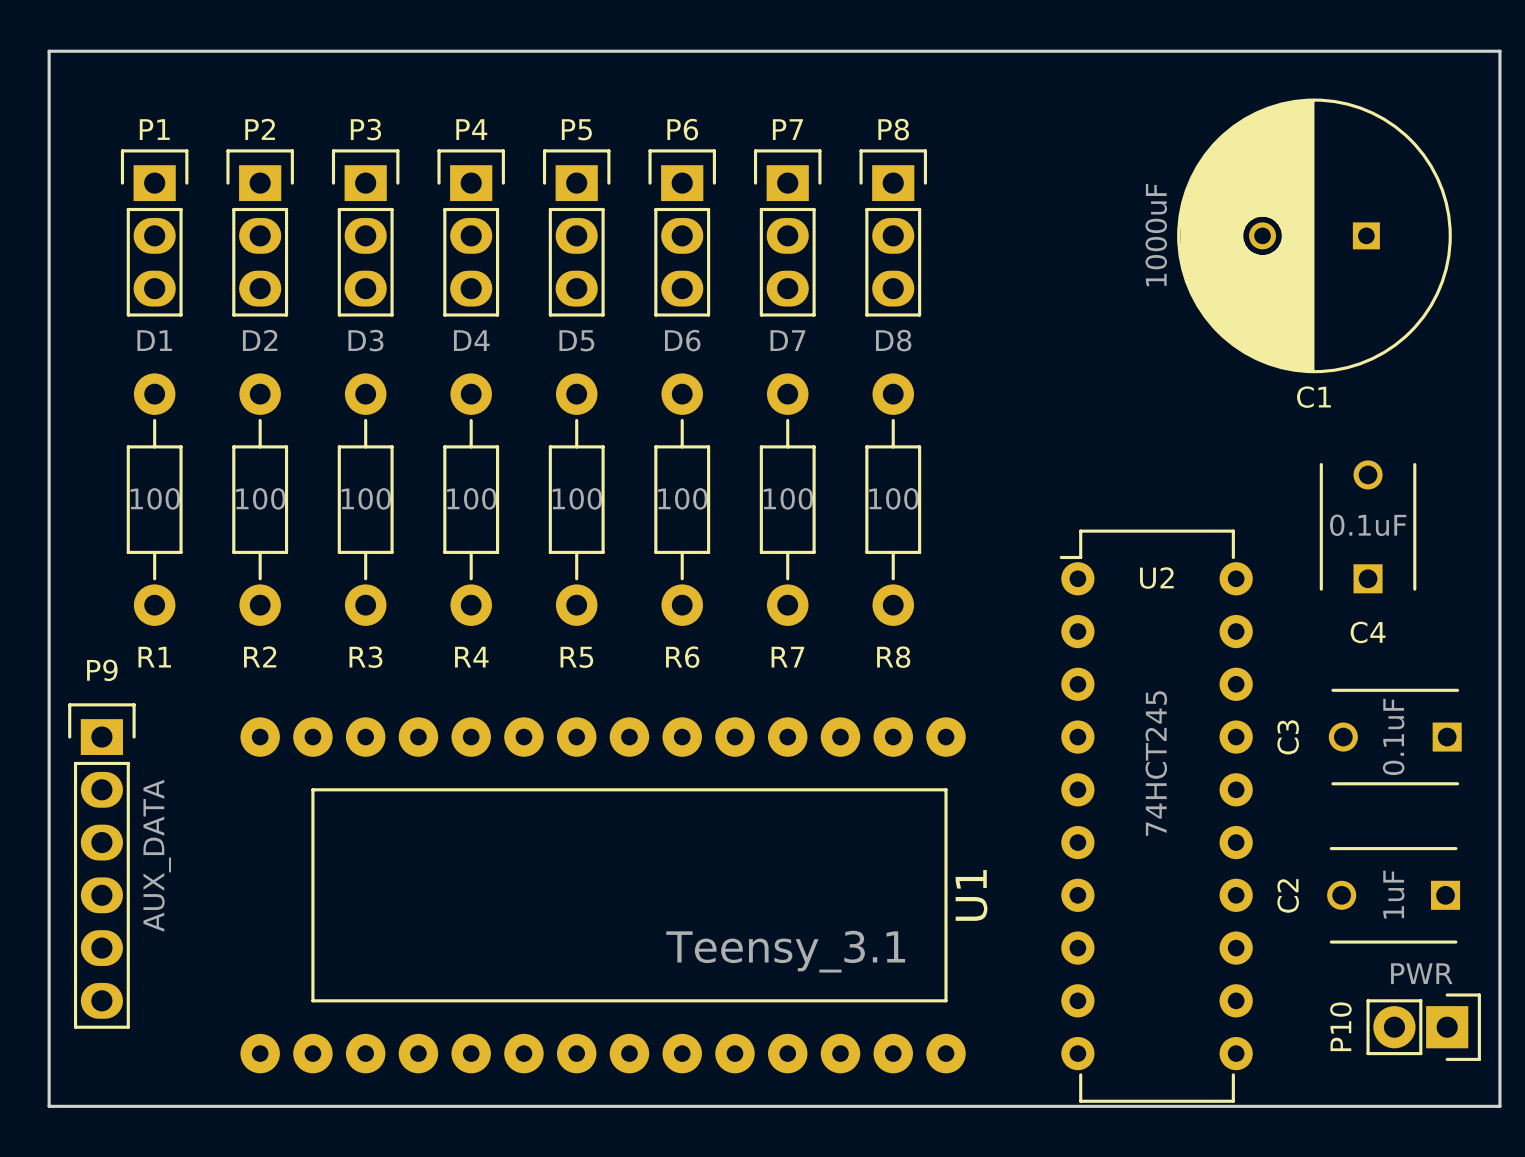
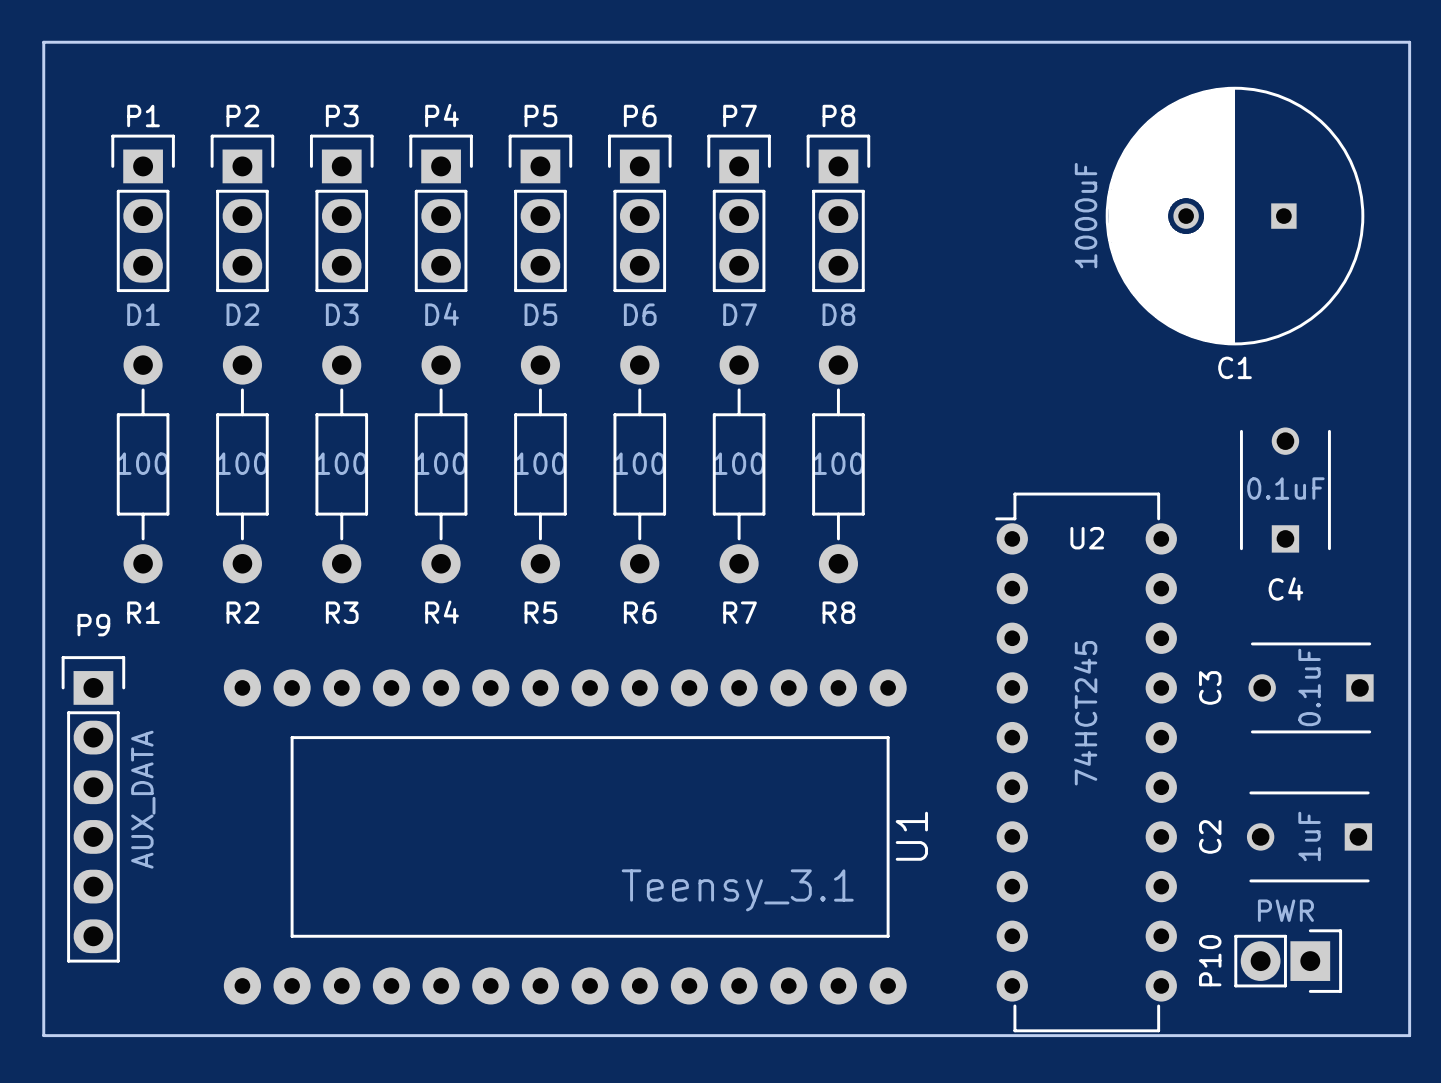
P10 position: (1423, 1027) -> (1288, 961)

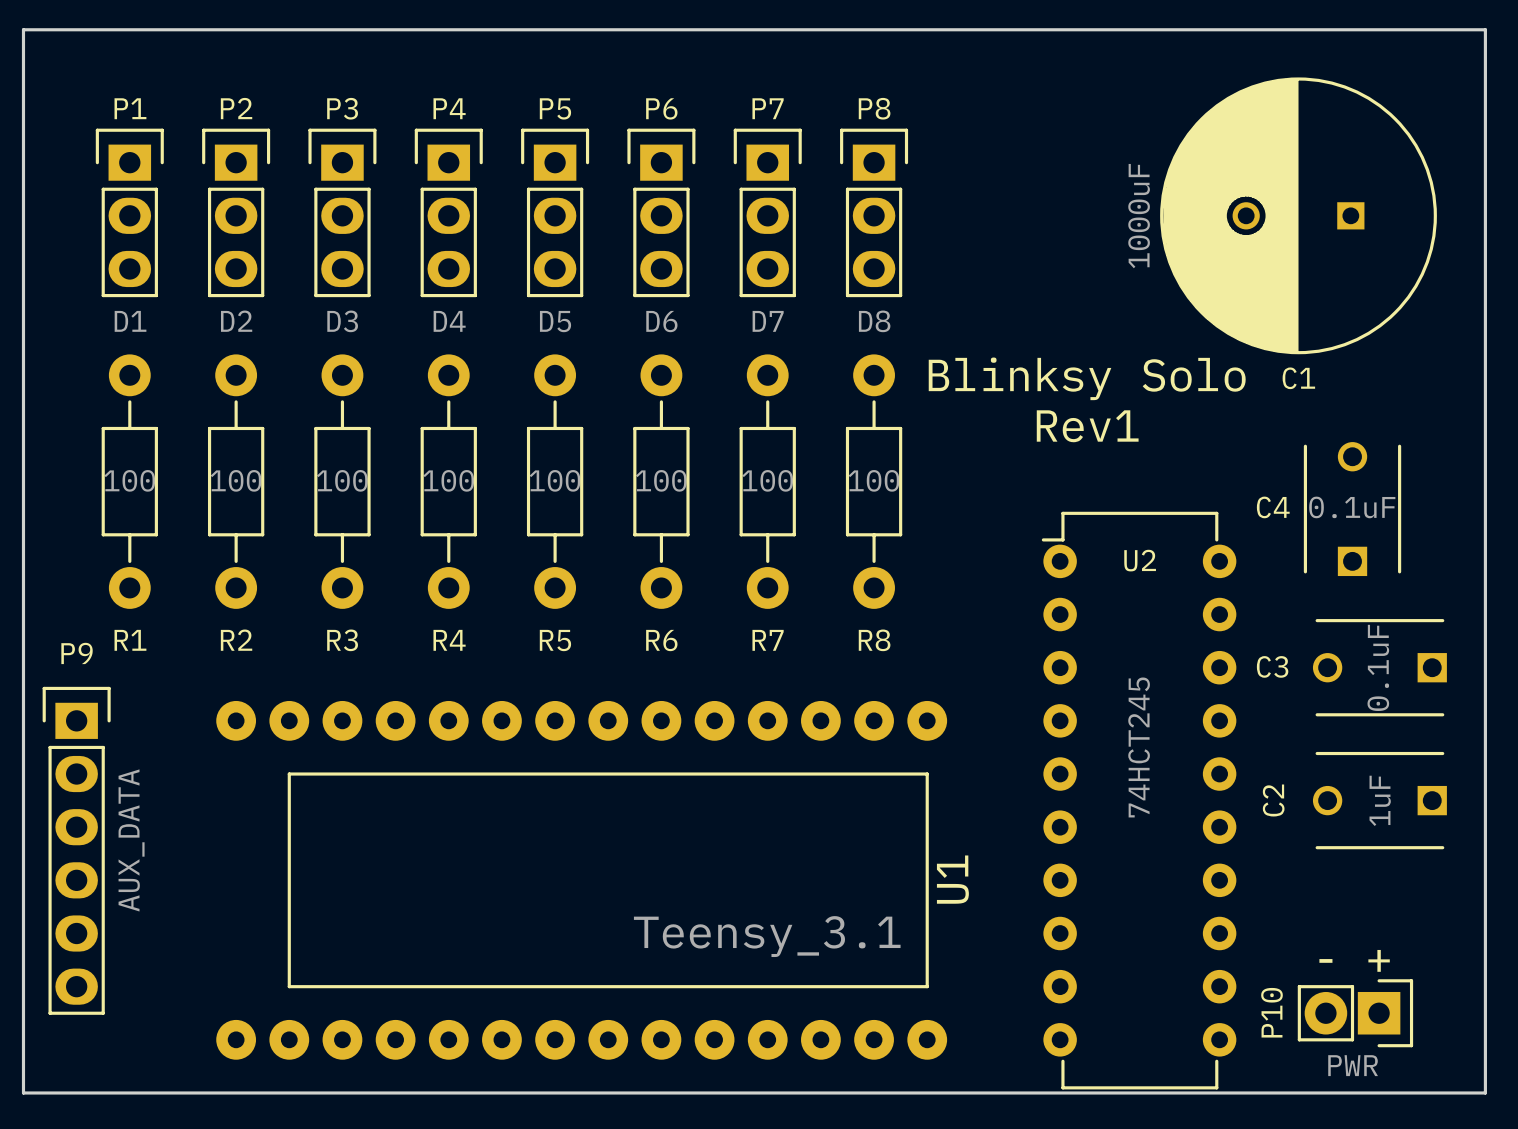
text: none -> Blinksy Solo (1087, 378)
text: none -> Rev1 (1087, 426)
C4 name position: C4 (1285, 588) -> C4 (1273, 507)
C3 name rotation: 0° (1210, 687) -> 90° clockwise (1272, 666)
C3 position: (1311, 687) -> (1379, 667)
C2 position: (1309, 836) -> (1379, 800)
P10 value position: PWR (1285, 910) -> PWR (1353, 1065)
text: none -> - (1325, 960)
text: none -> + (1379, 960)

